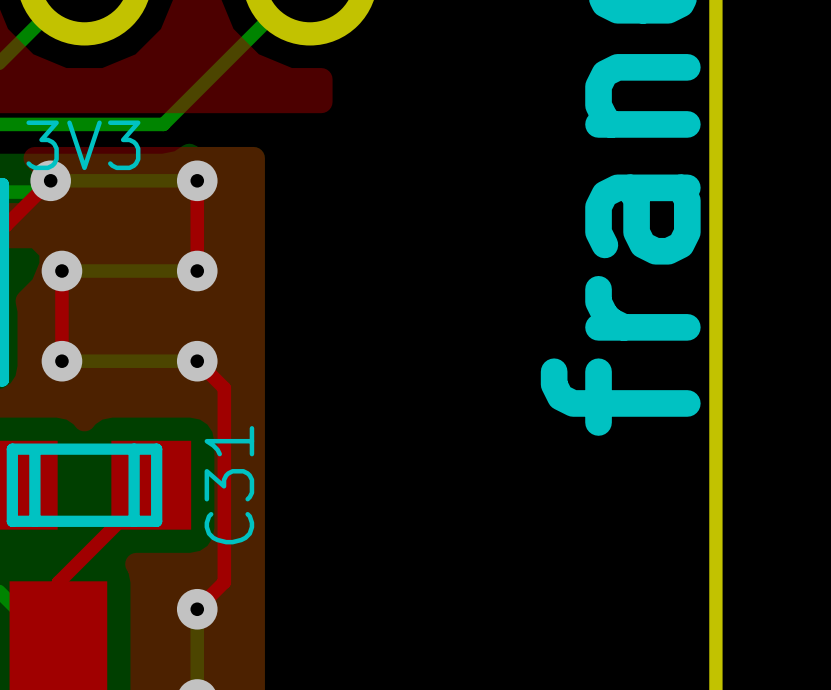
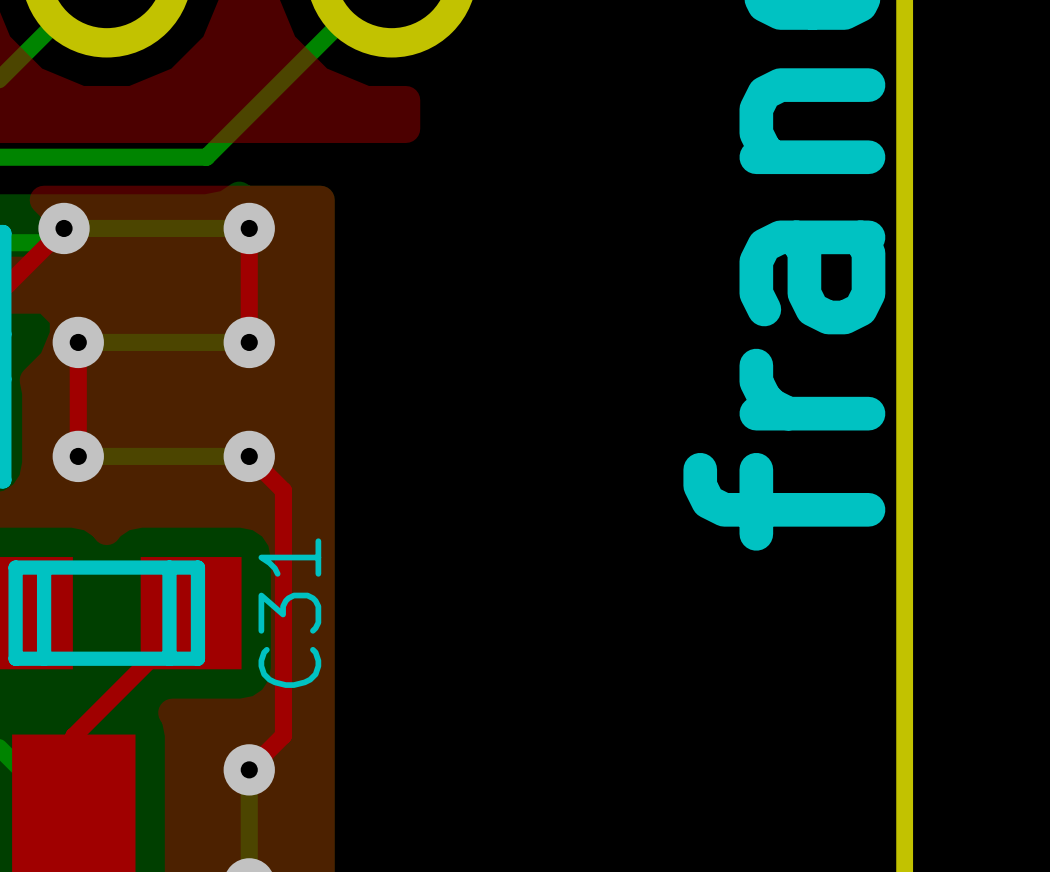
text: 3V3 (83, 145) -> none

